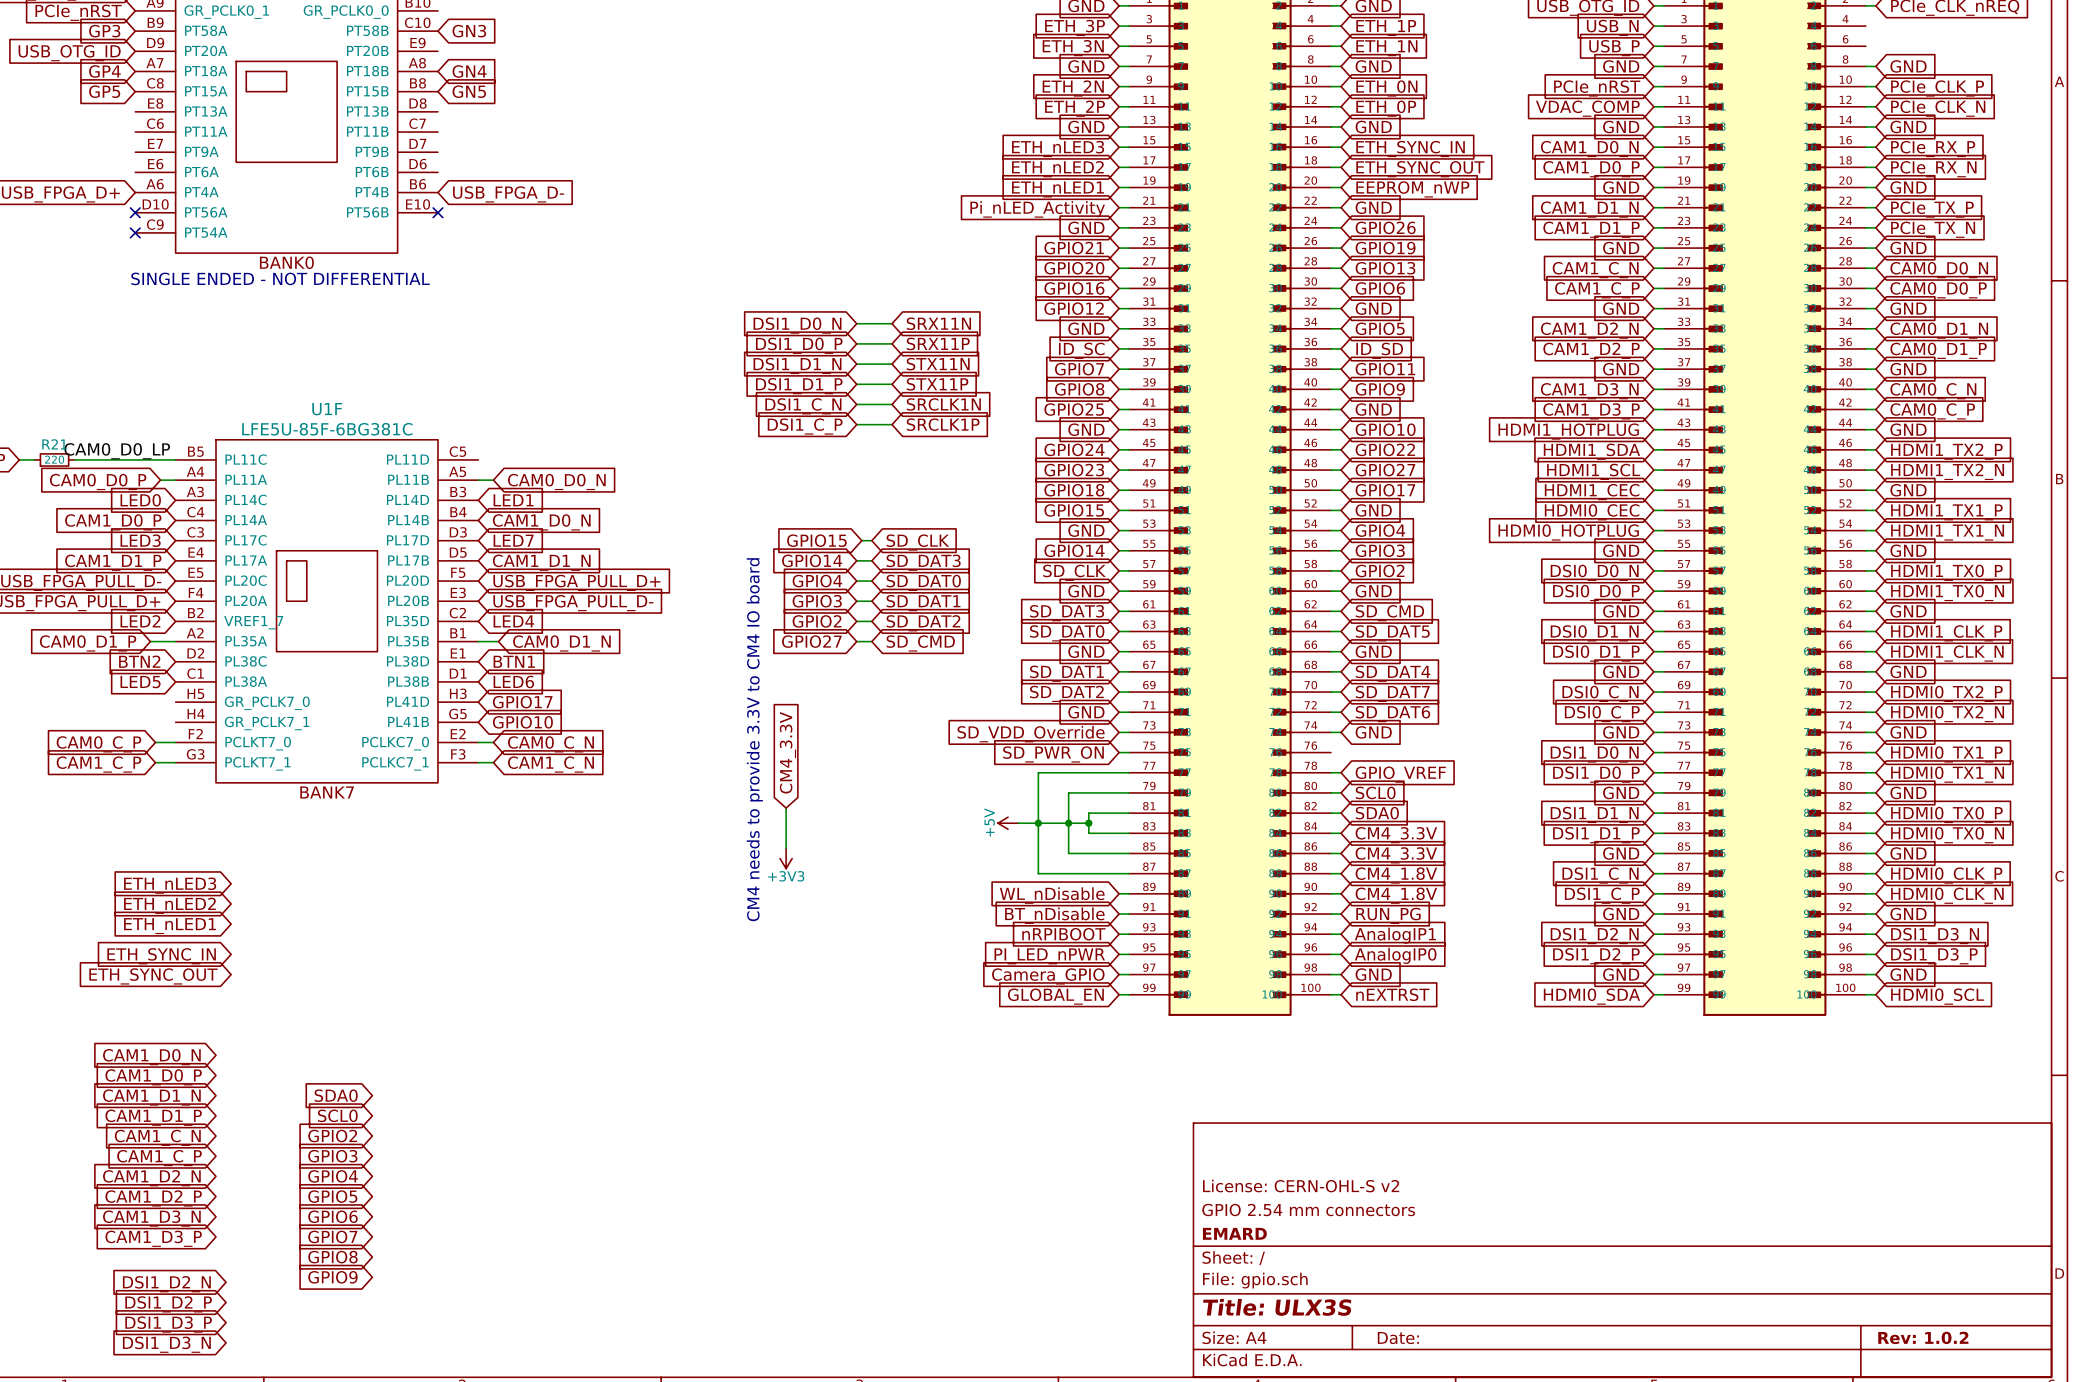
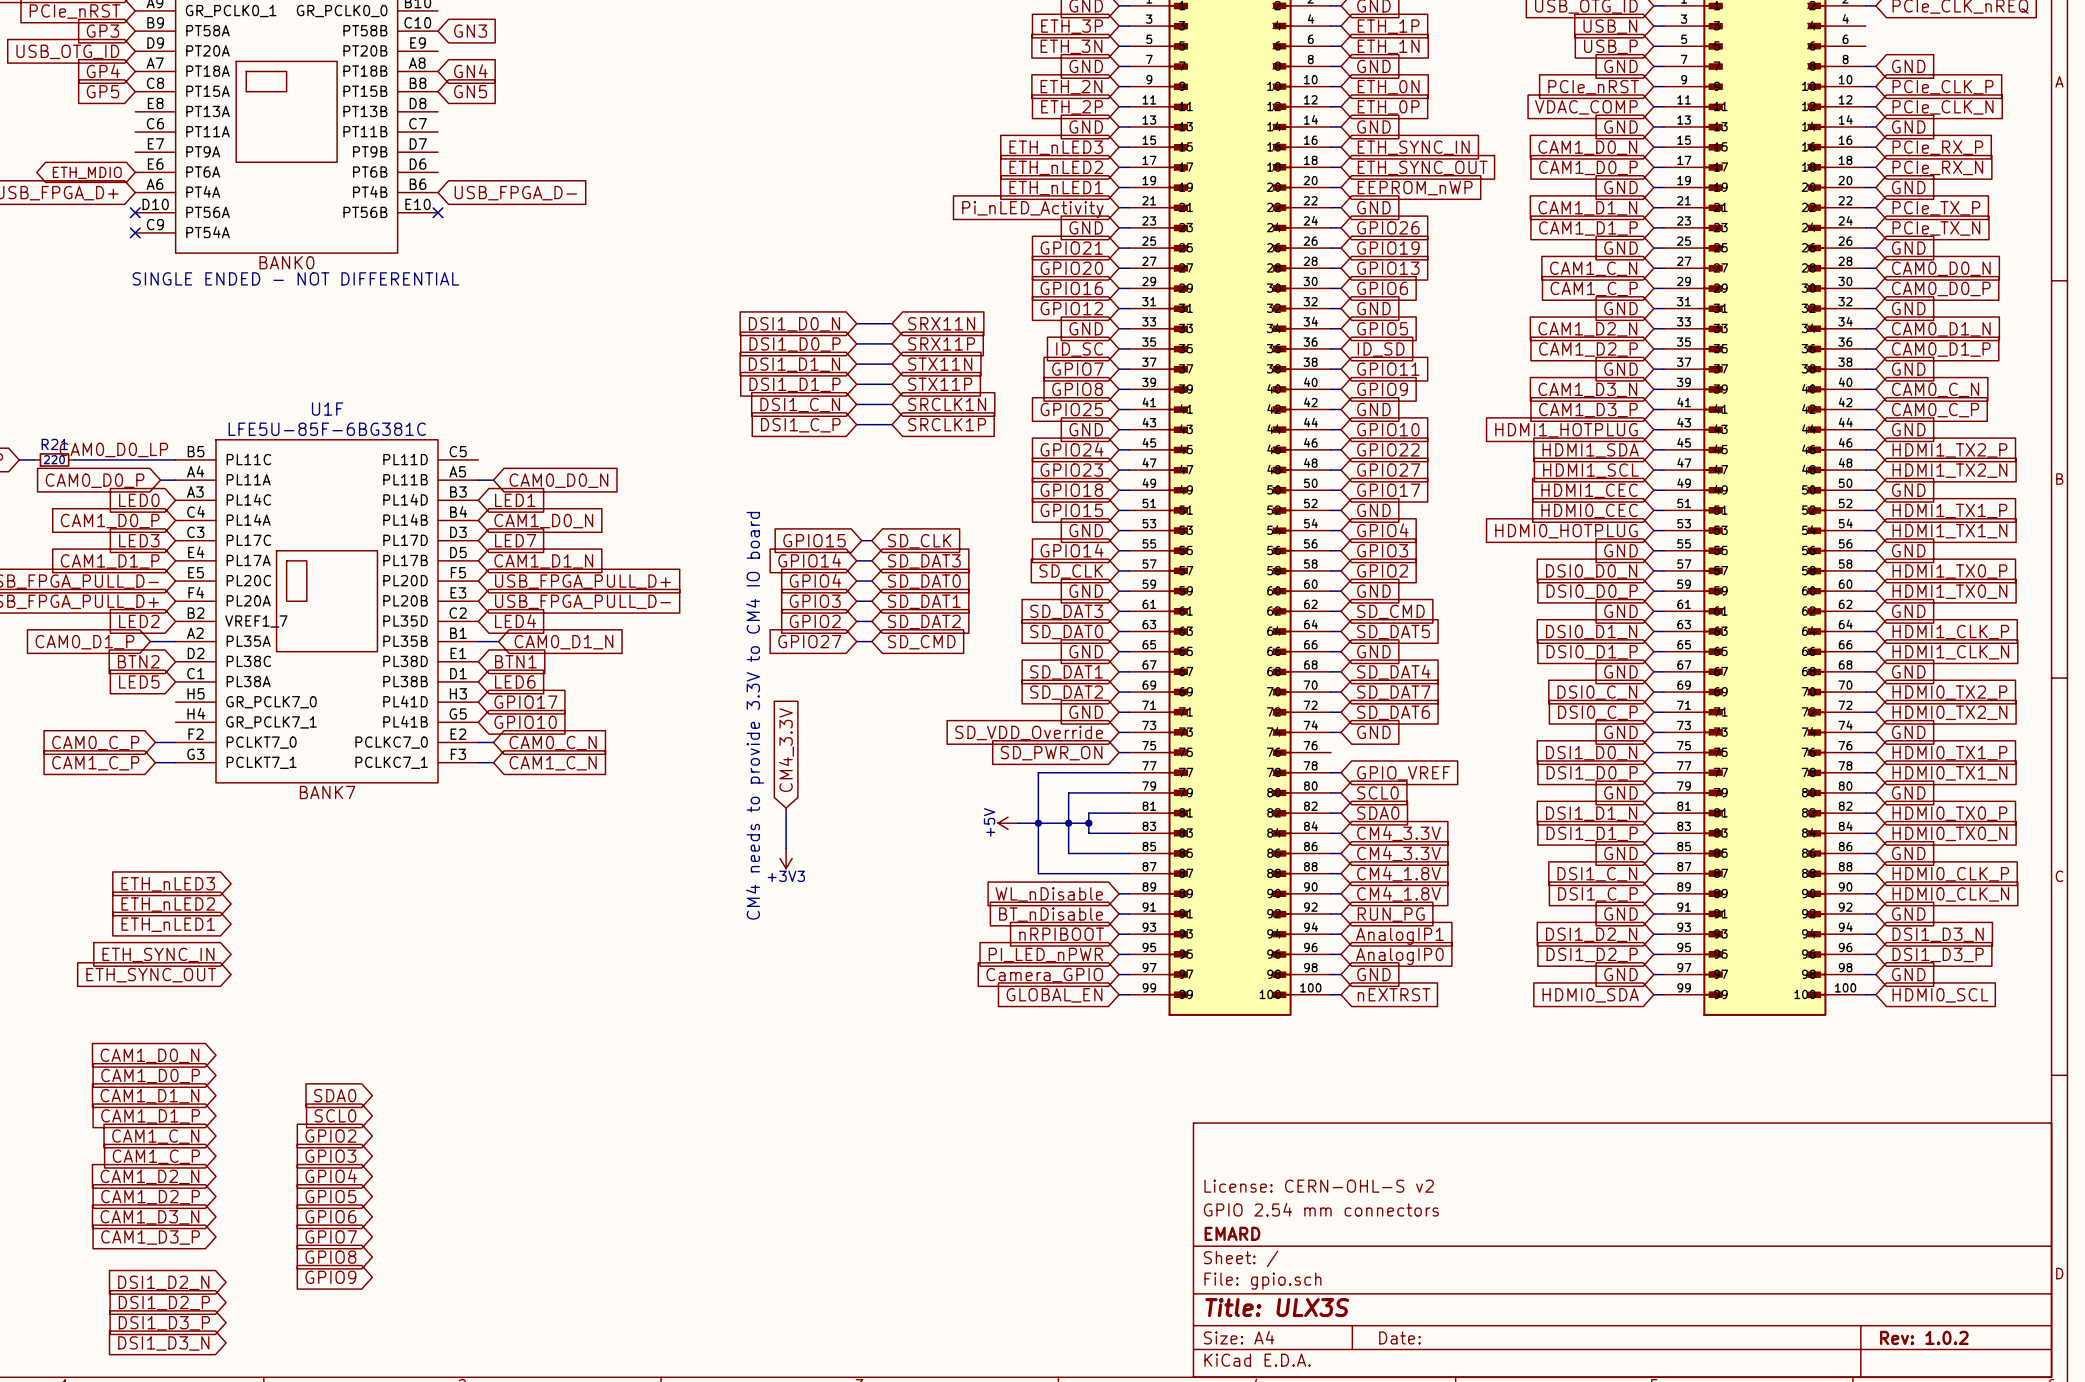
global label: none -> ETH_MDIO (87, 172)

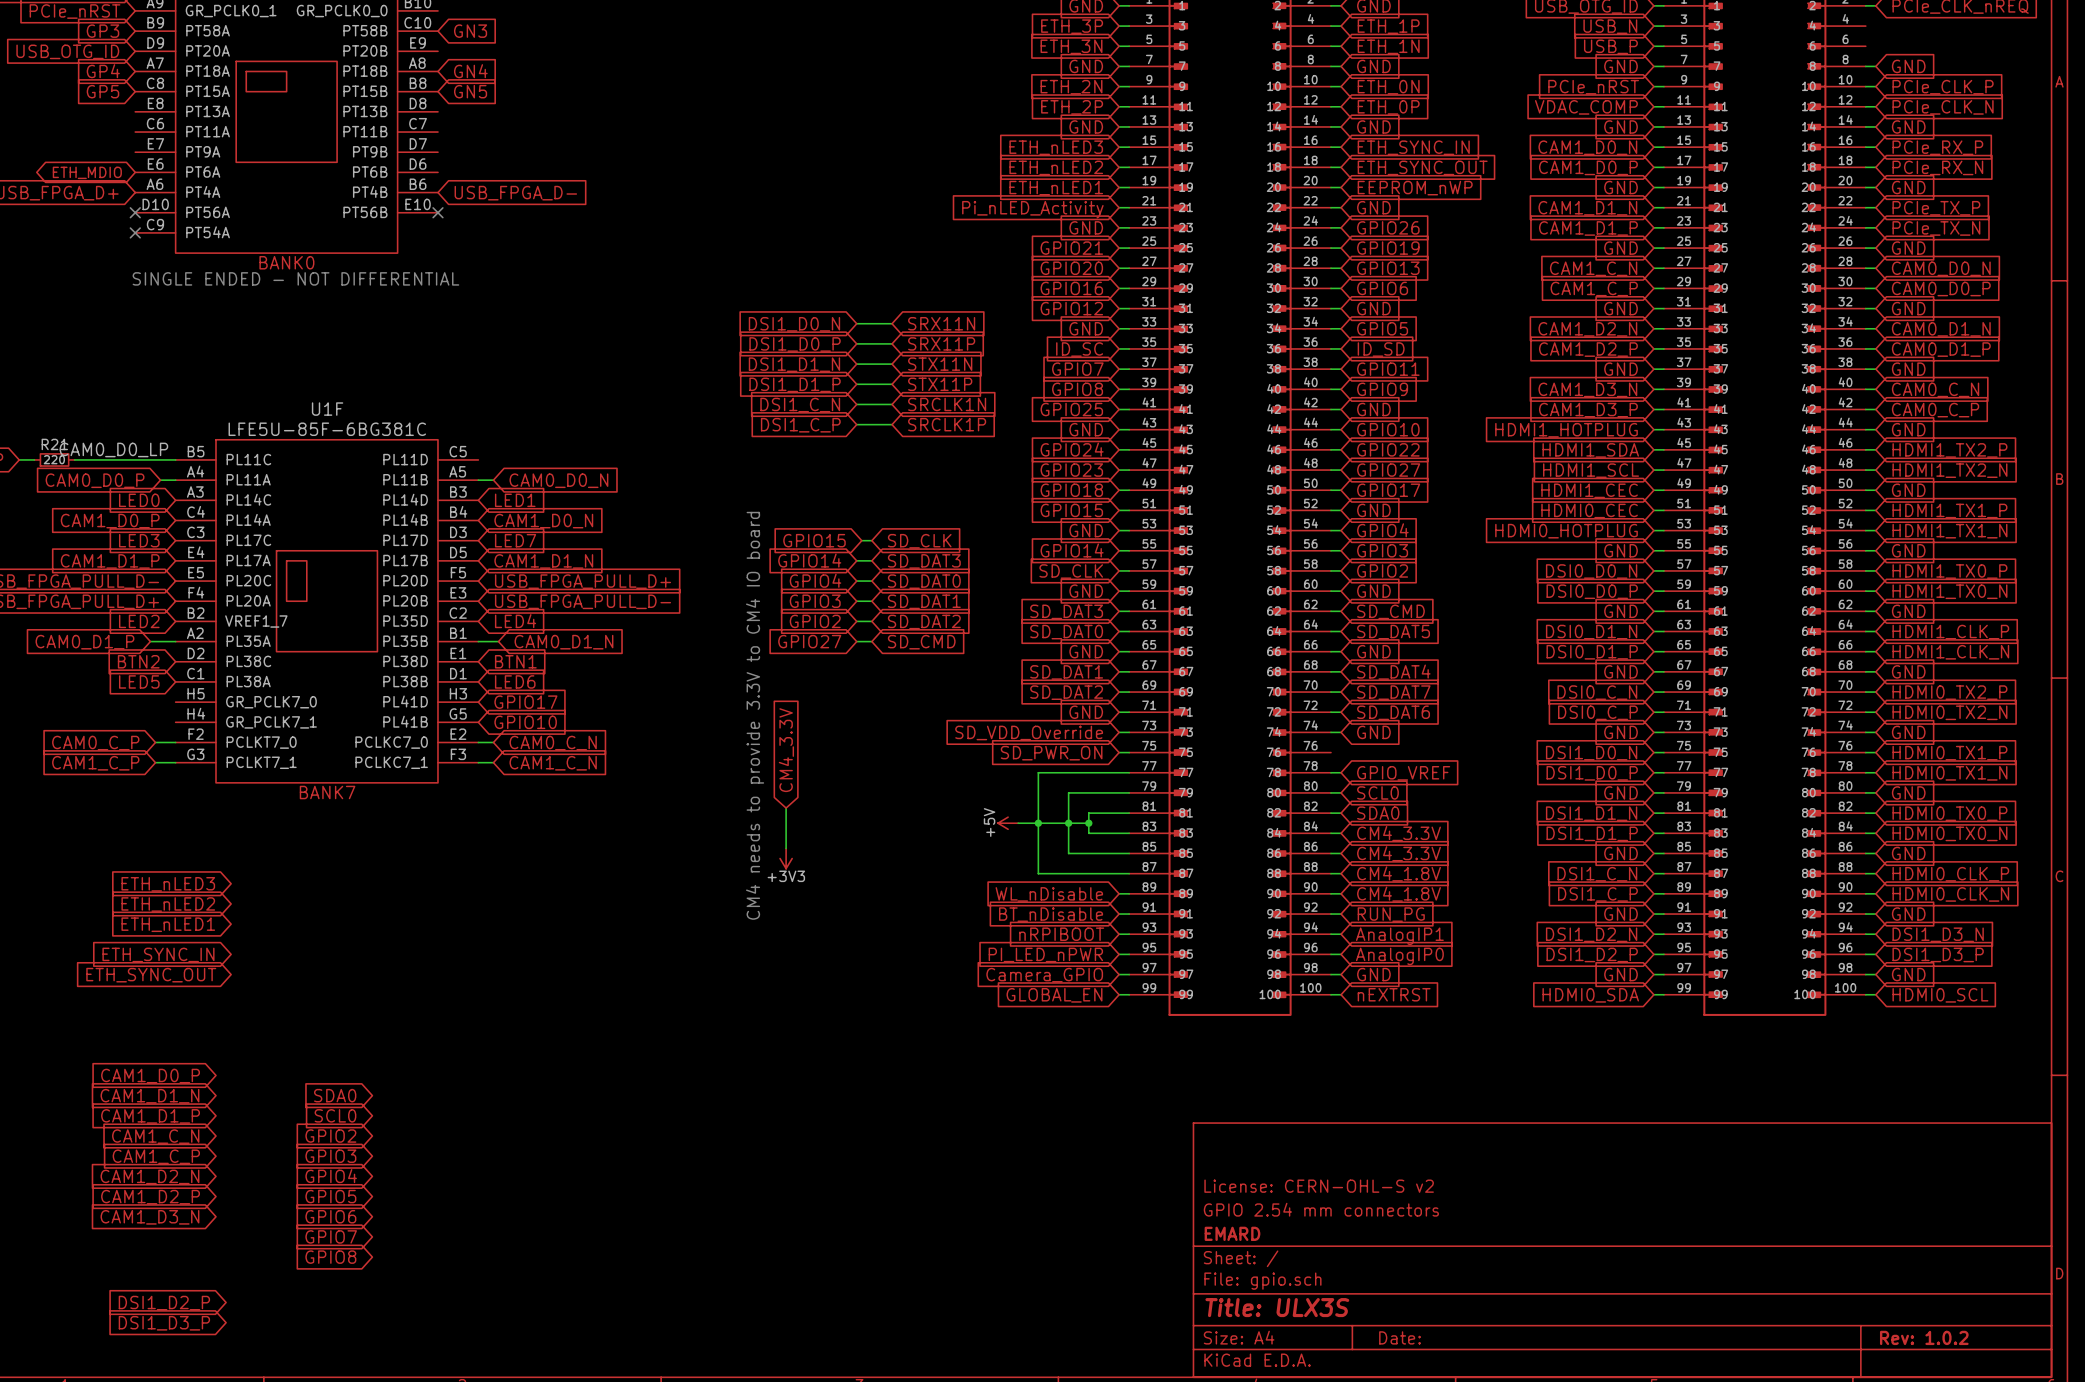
global label: CAM1_D0_N (149, 1055) -> none
global label: CAM1_D3_P (150, 1237) -> none
global label: GPIO9 (330, 1277) -> none
global label: DSI1_D2_N (163, 1282) -> none
global label: DSI1_D3_N (163, 1343) -> none

